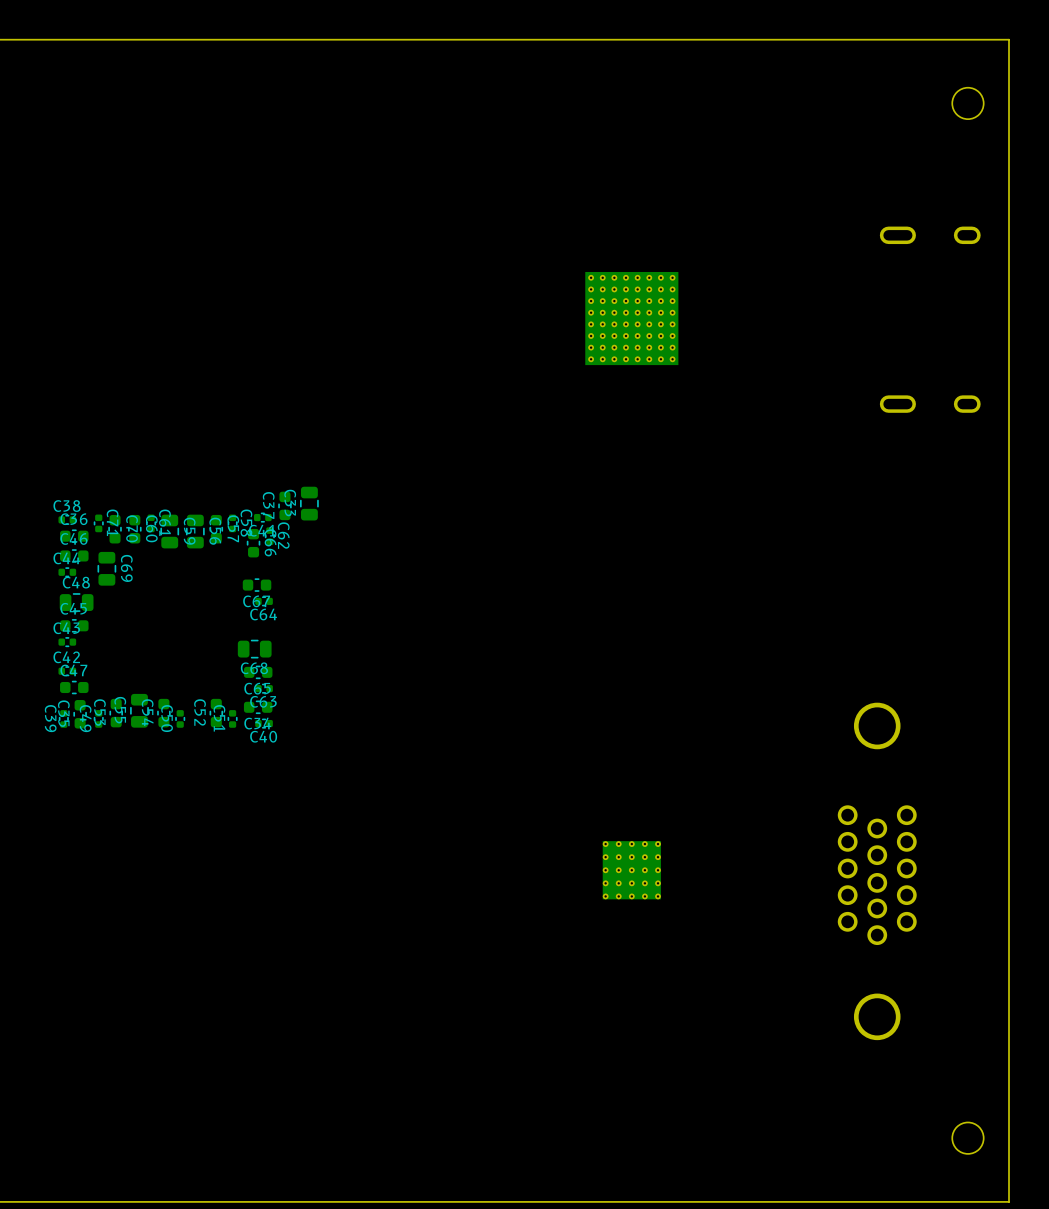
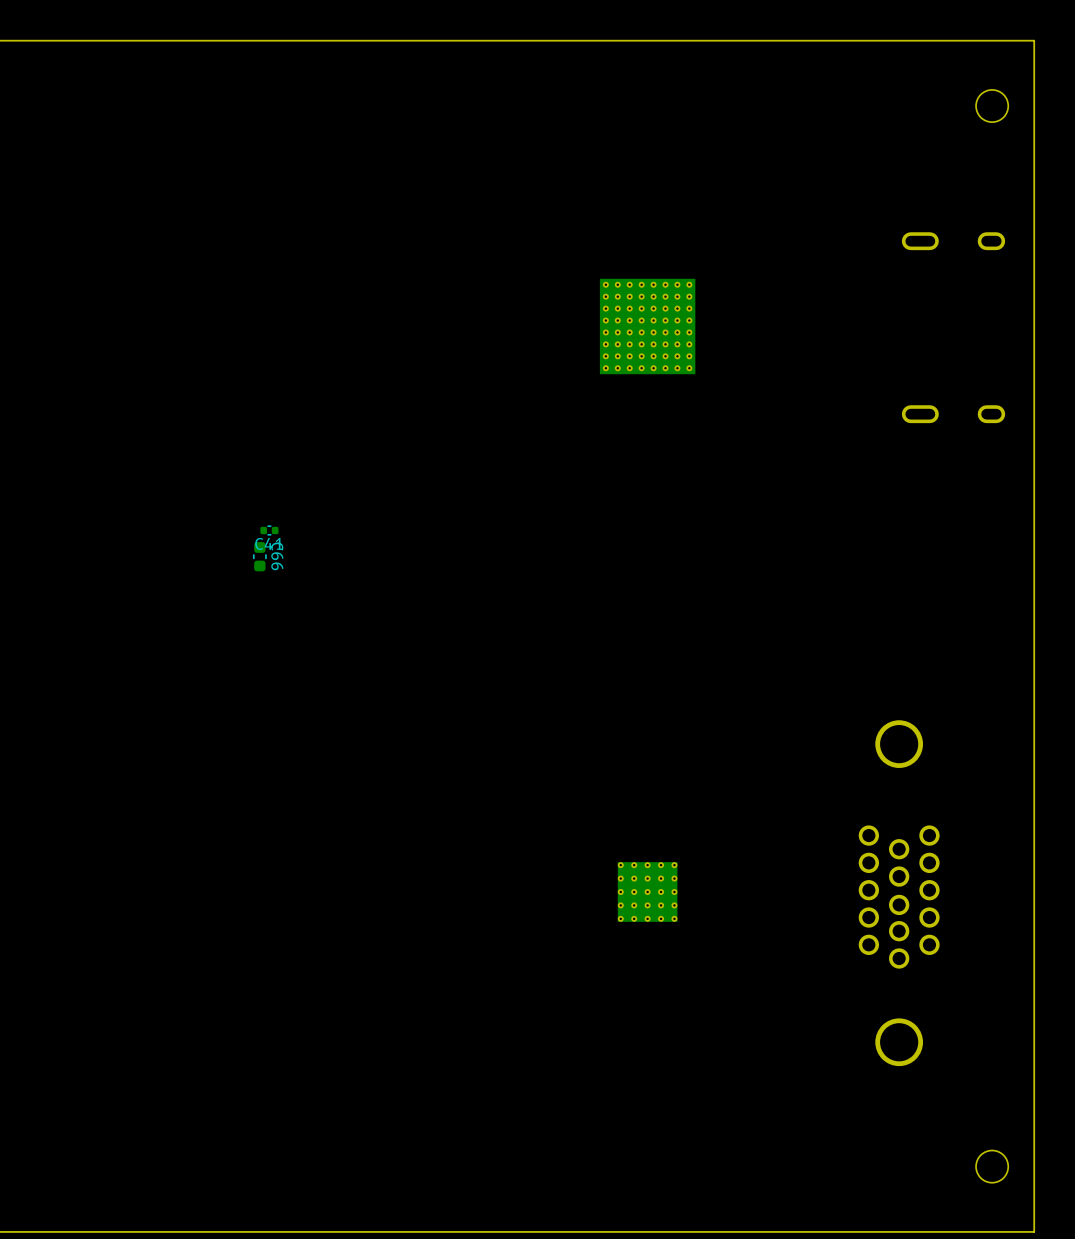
C33: (309, 503) -> none
C37: (284, 505) -> none
C38: (67, 519) -> none
C71: (98, 523) -> none
C61: (151, 523) -> none
C58: (232, 523) -> none
C70: (115, 529) -> none
C60: (134, 529) -> none
C57: (216, 529) -> none
C59: (169, 531) -> none
C56: (195, 531) -> none
C36: (74, 536) -> none
C62: (269, 536) -> none
C46: (74, 555) -> none
C69: (106, 568) -> none
C44: (67, 572) -> none
C67: (257, 585) -> none
C64: (264, 601) -> none
C48: (76, 602) -> none
C45: (74, 625) -> none
C43: (67, 642) -> none
C68: (254, 649) -> none
C42: (67, 671) -> none
C65: (258, 672) -> none
C47: (74, 687) -> none
C63: (264, 688) -> none
C34: (258, 707) -> none
C55: (139, 710) -> none
C53: (116, 713) -> none
C54: (163, 713) -> none
C52: (216, 713) -> none
C35: (80, 714) -> none
C39: (63, 718) -> none
C49: (98, 718) -> none
C50: (180, 718) -> none
C51: (232, 718) -> none
C40: (264, 723) -> none

